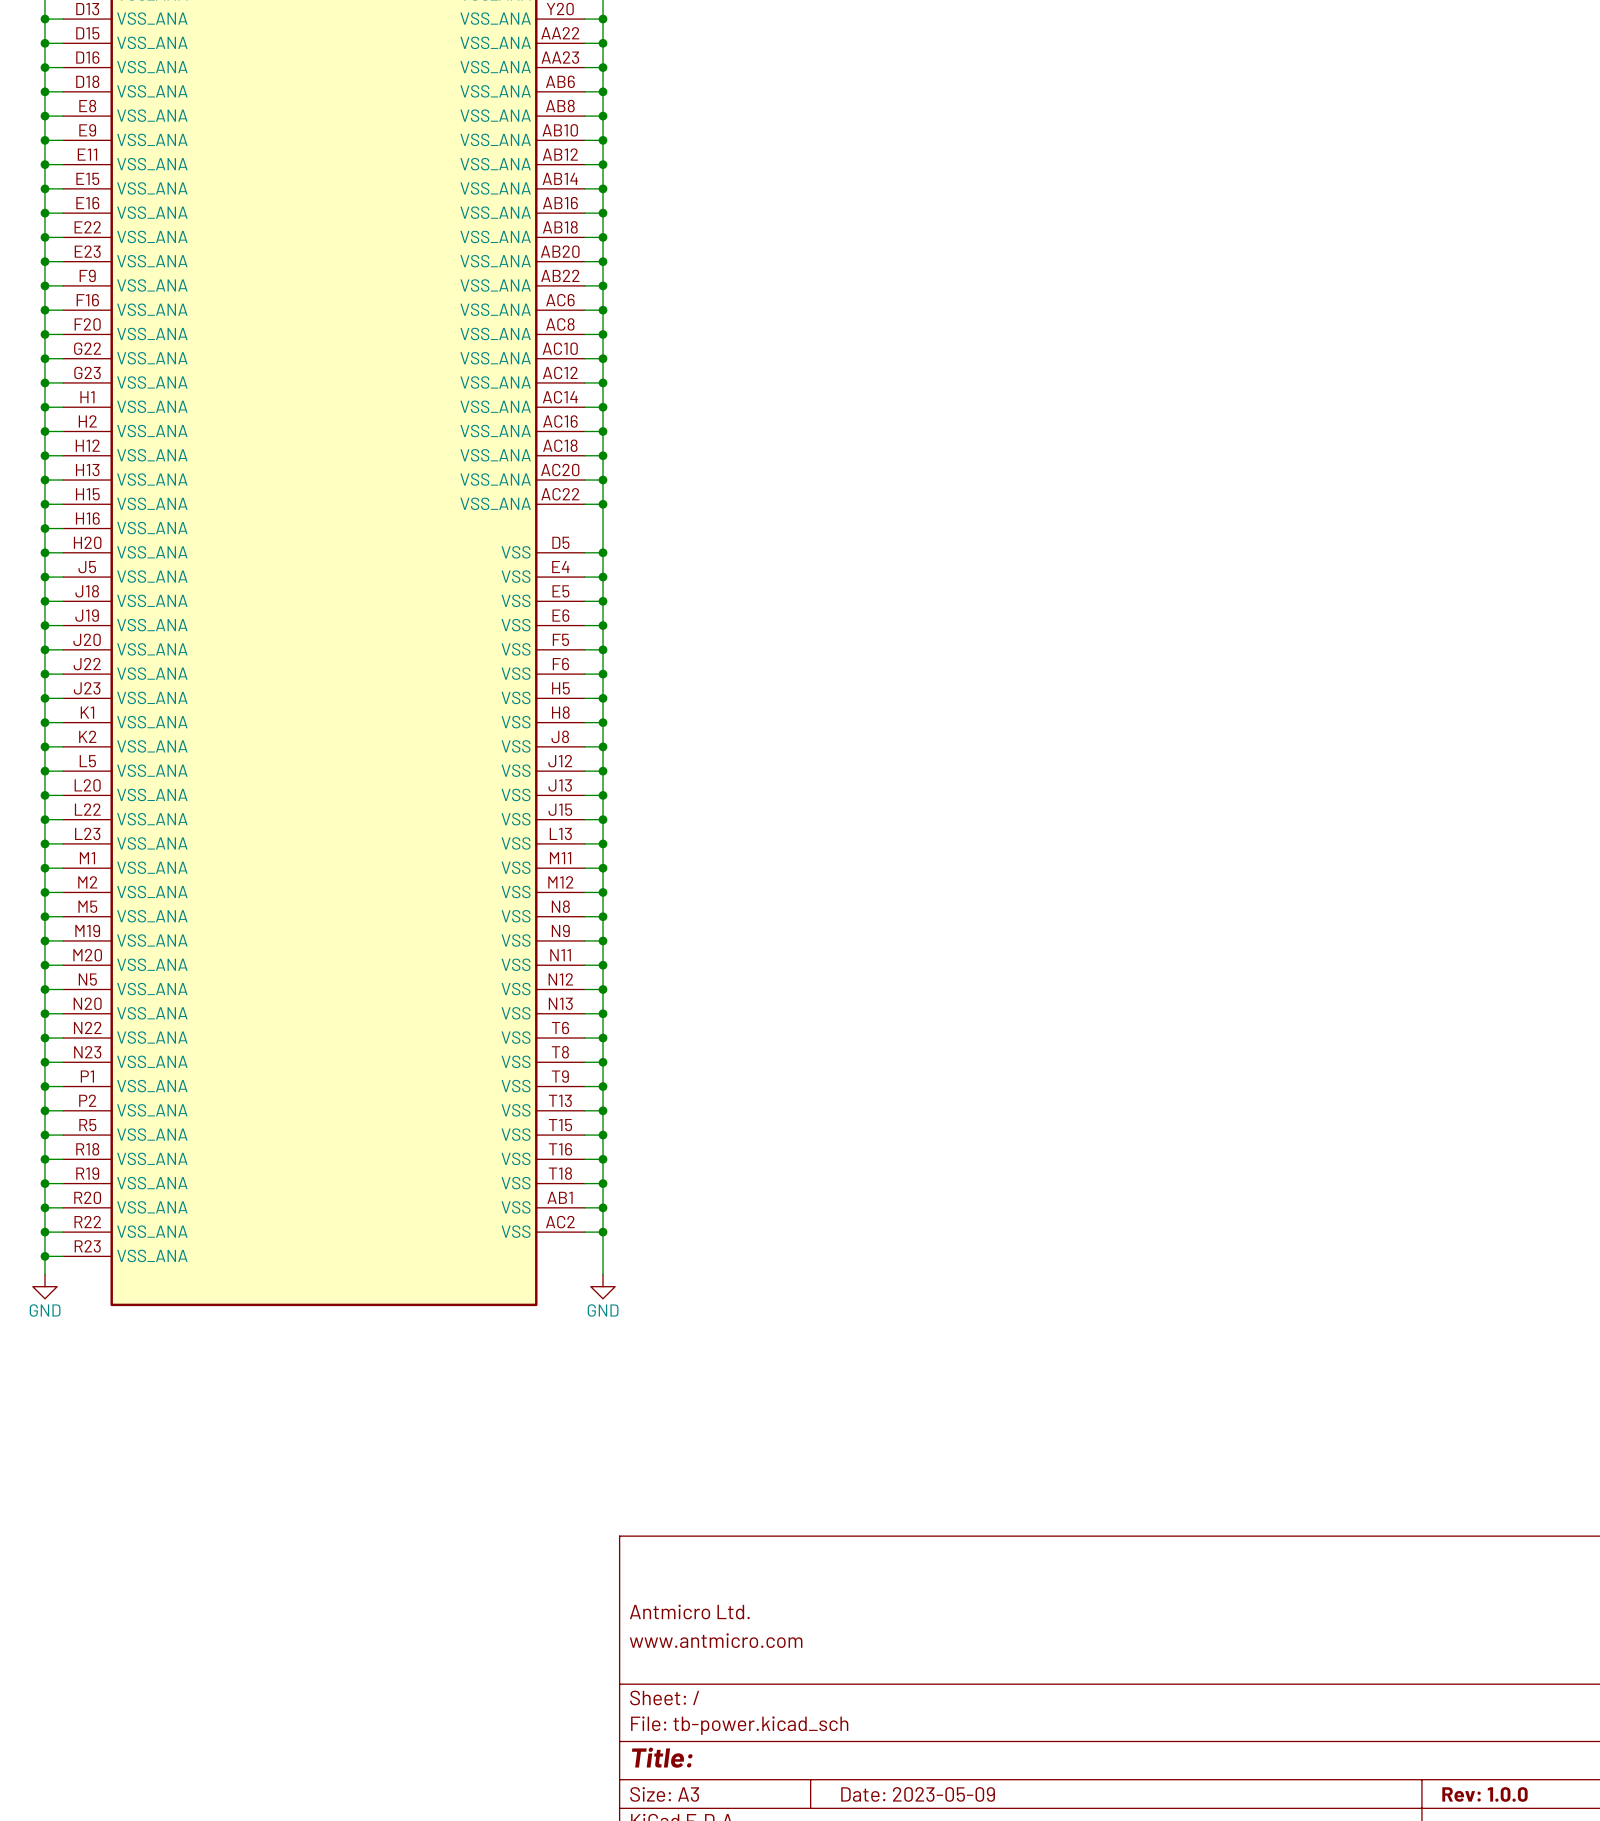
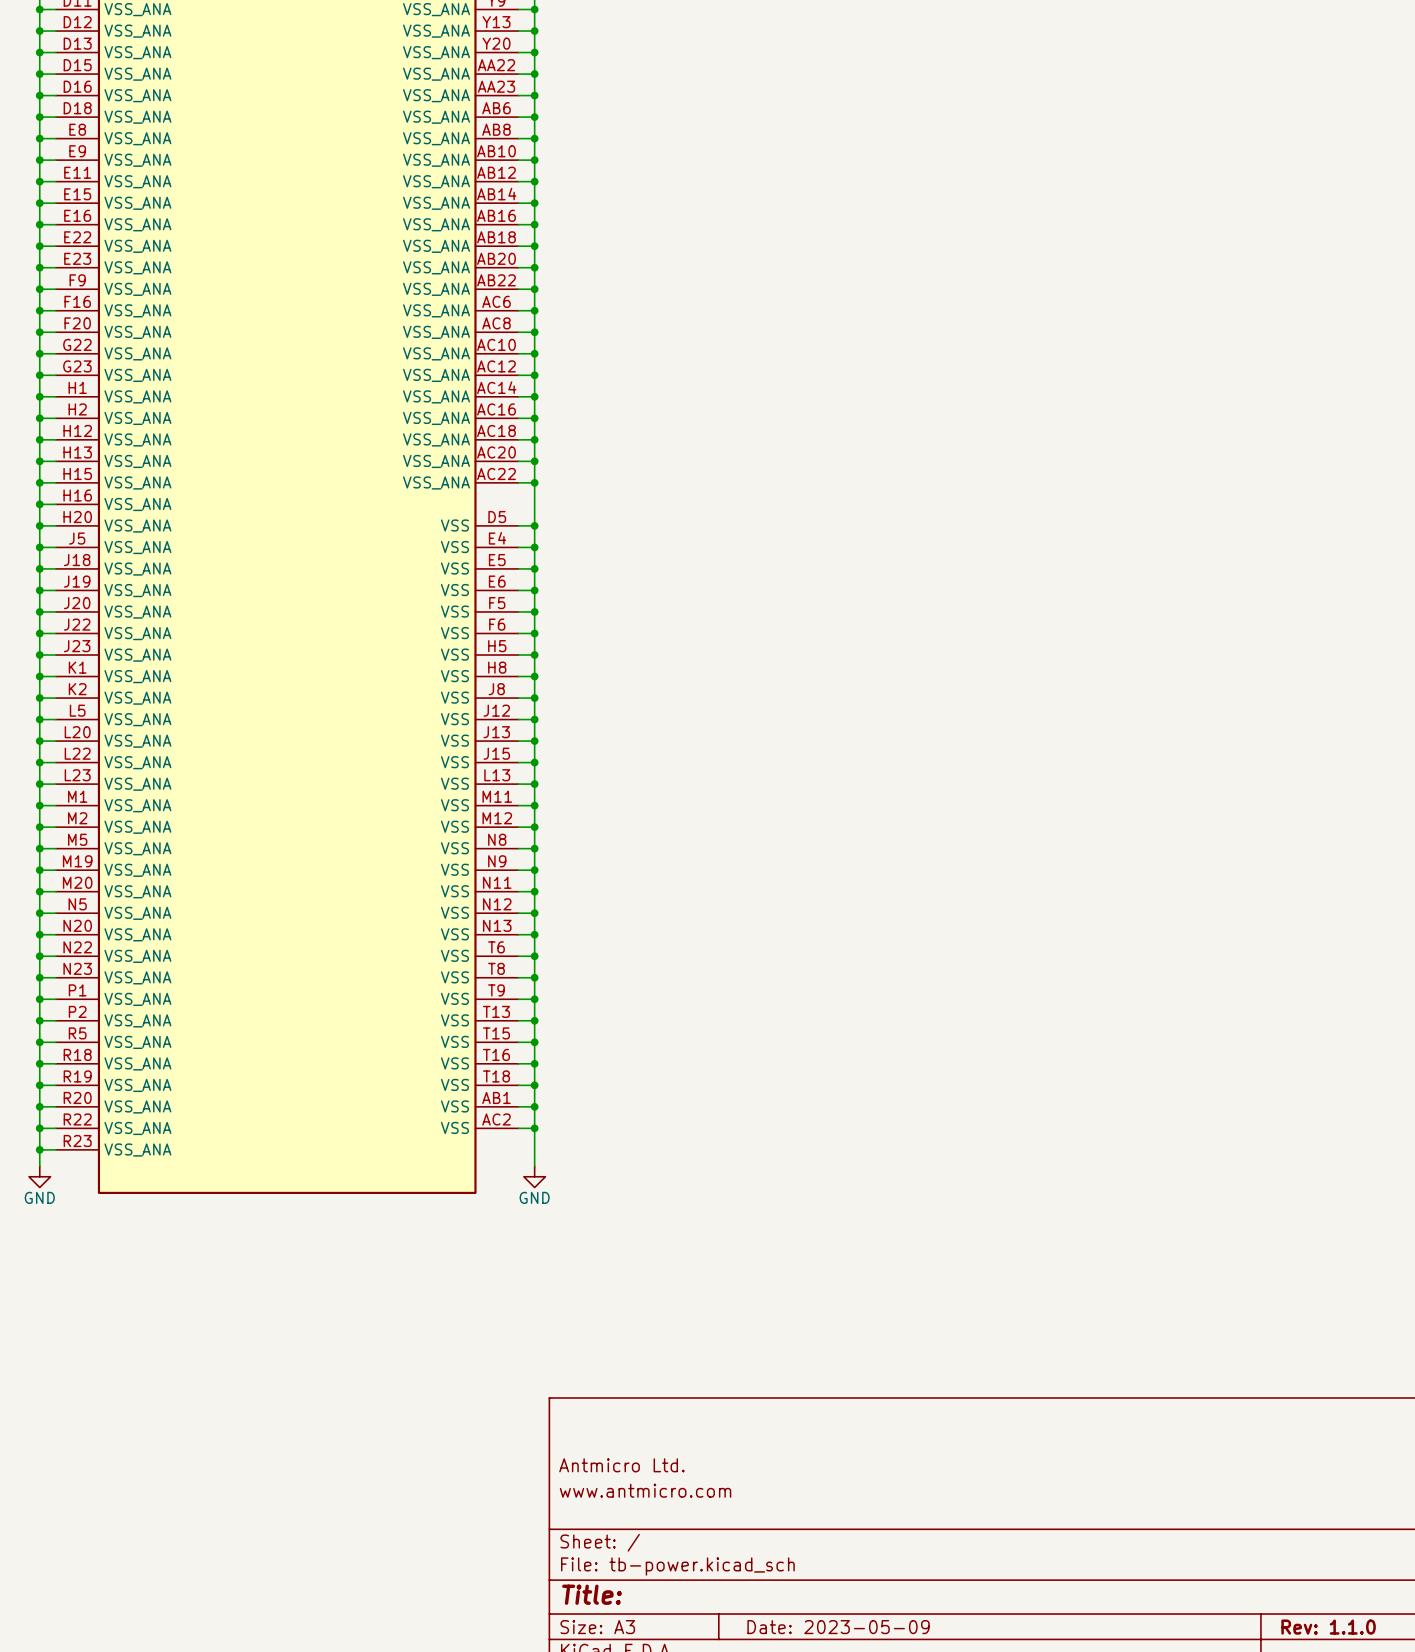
title block: Rev: 1.0.0 (1484, 1794) -> Rev: 1.1.0 (1328, 1627)

